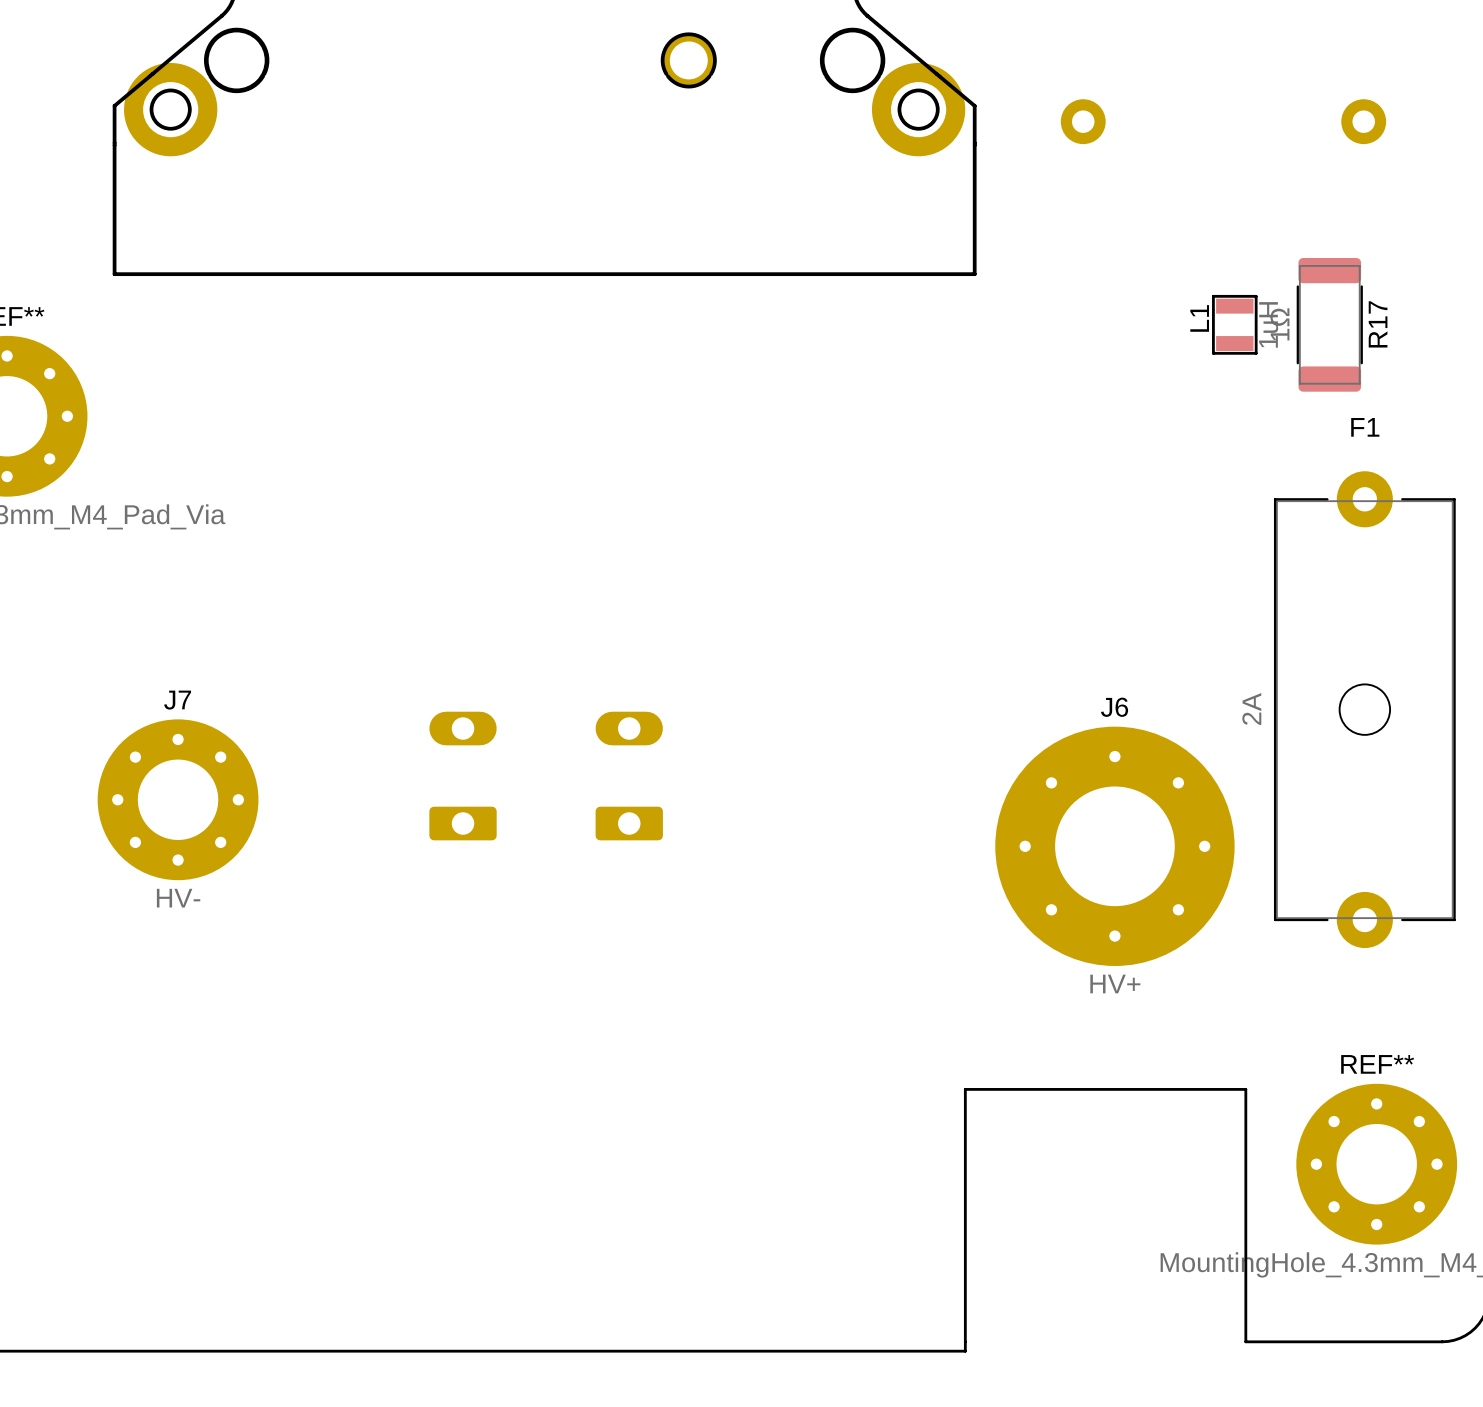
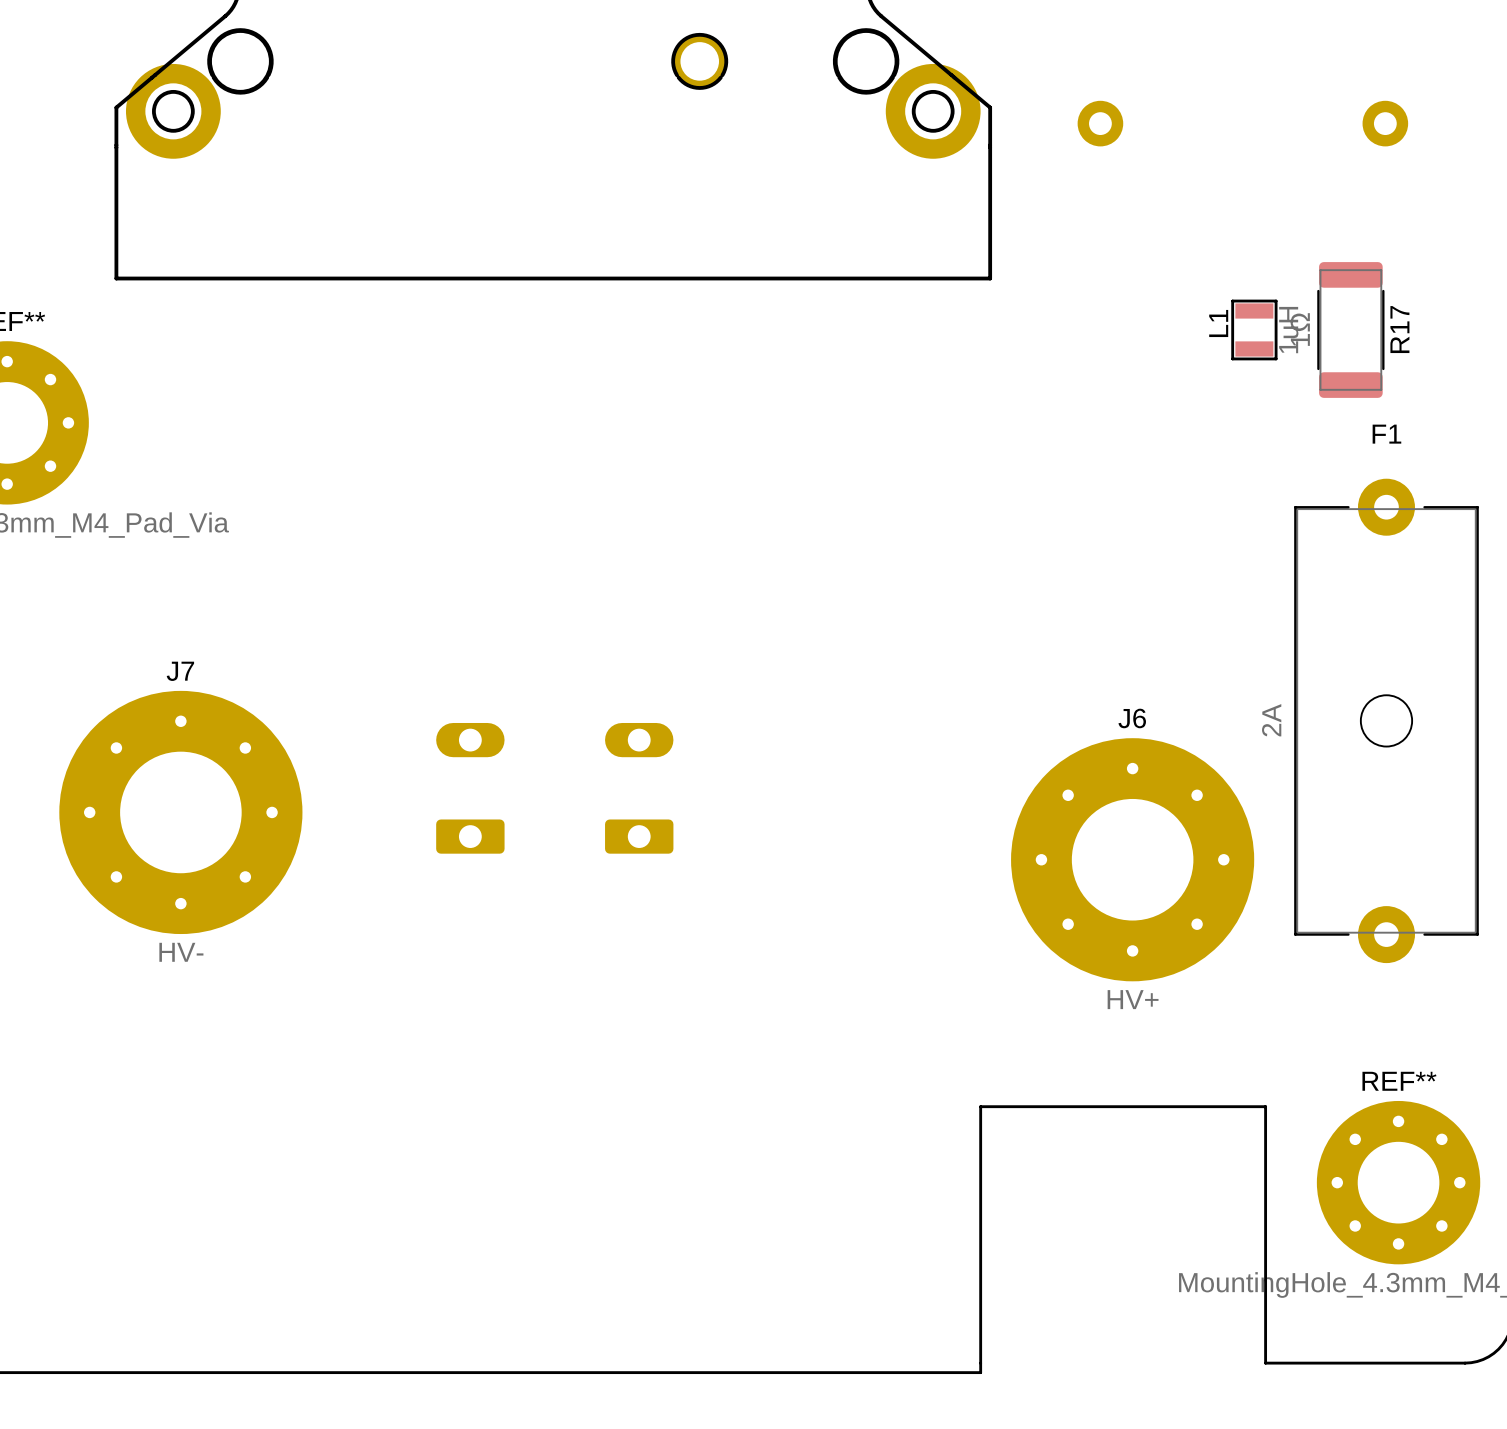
J7 name position: J7 (177, 700) -> J7 (180, 671)
J7 footprint: [97, 719, 259, 881] -> [59, 690, 303, 935]
J7 value position: HV- (178, 898) -> HV- (181, 952)

